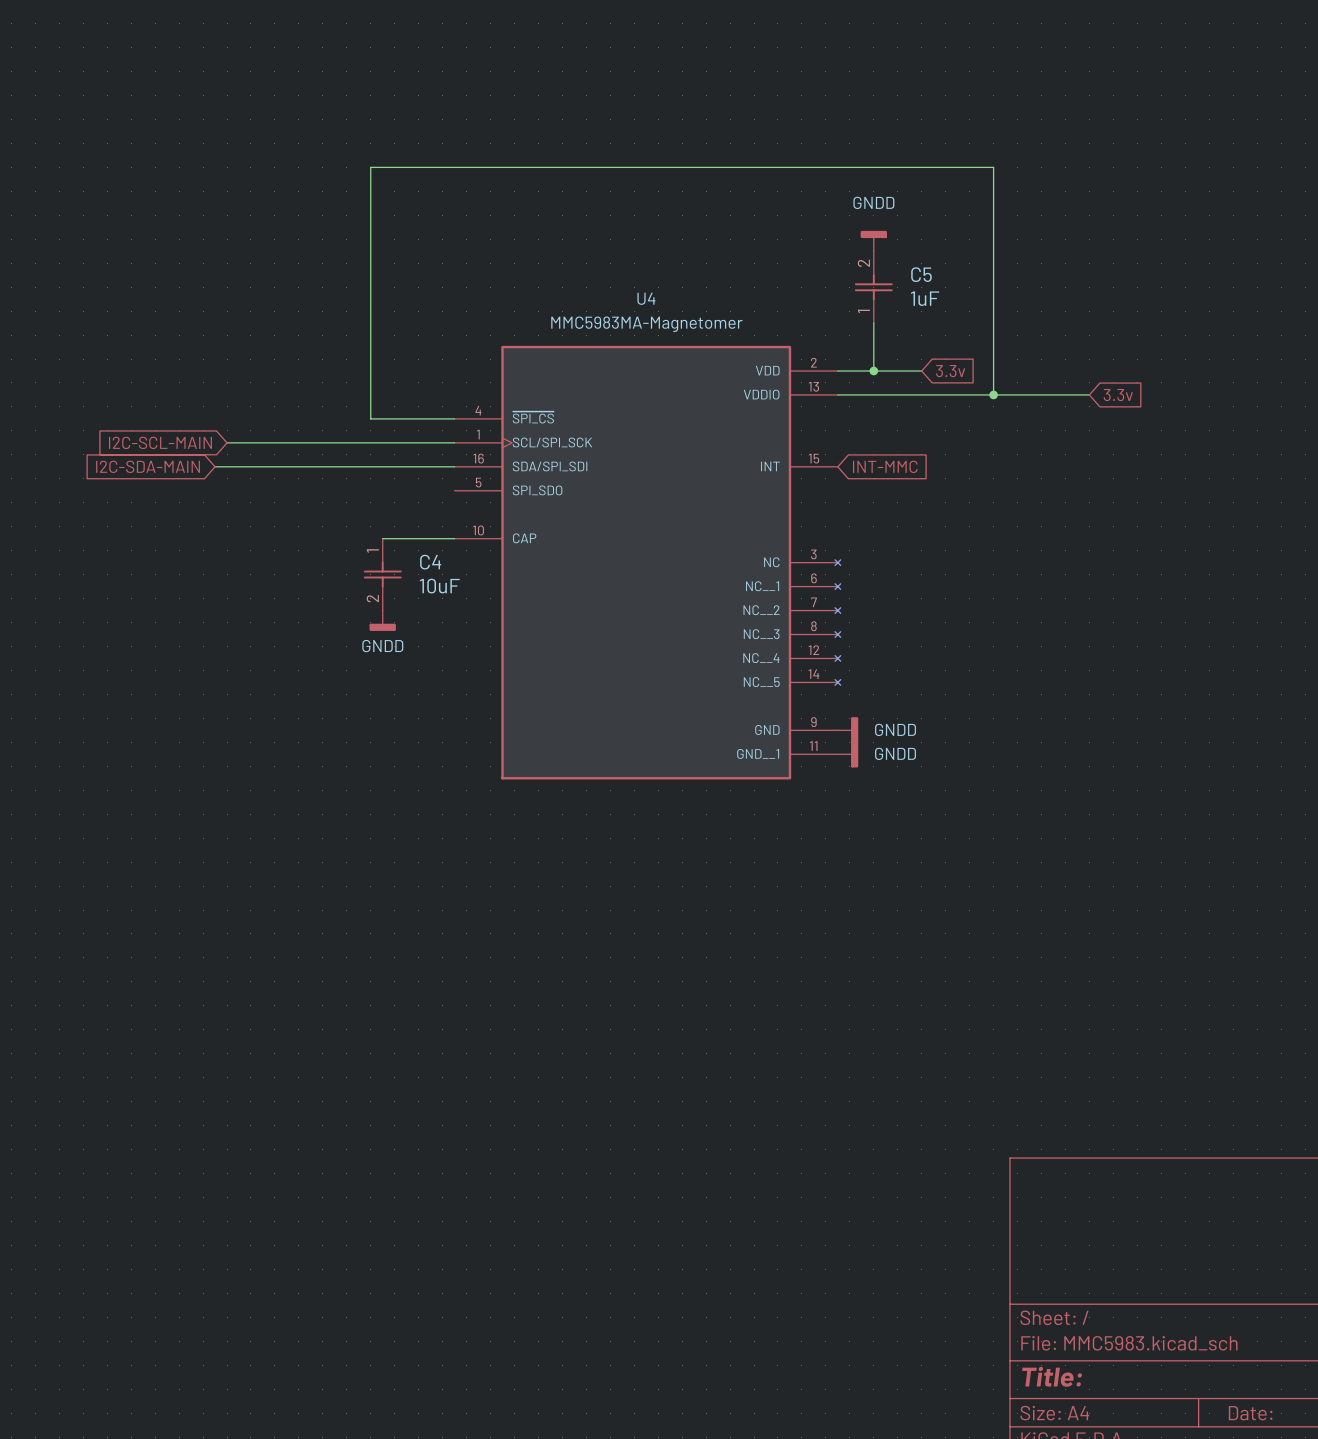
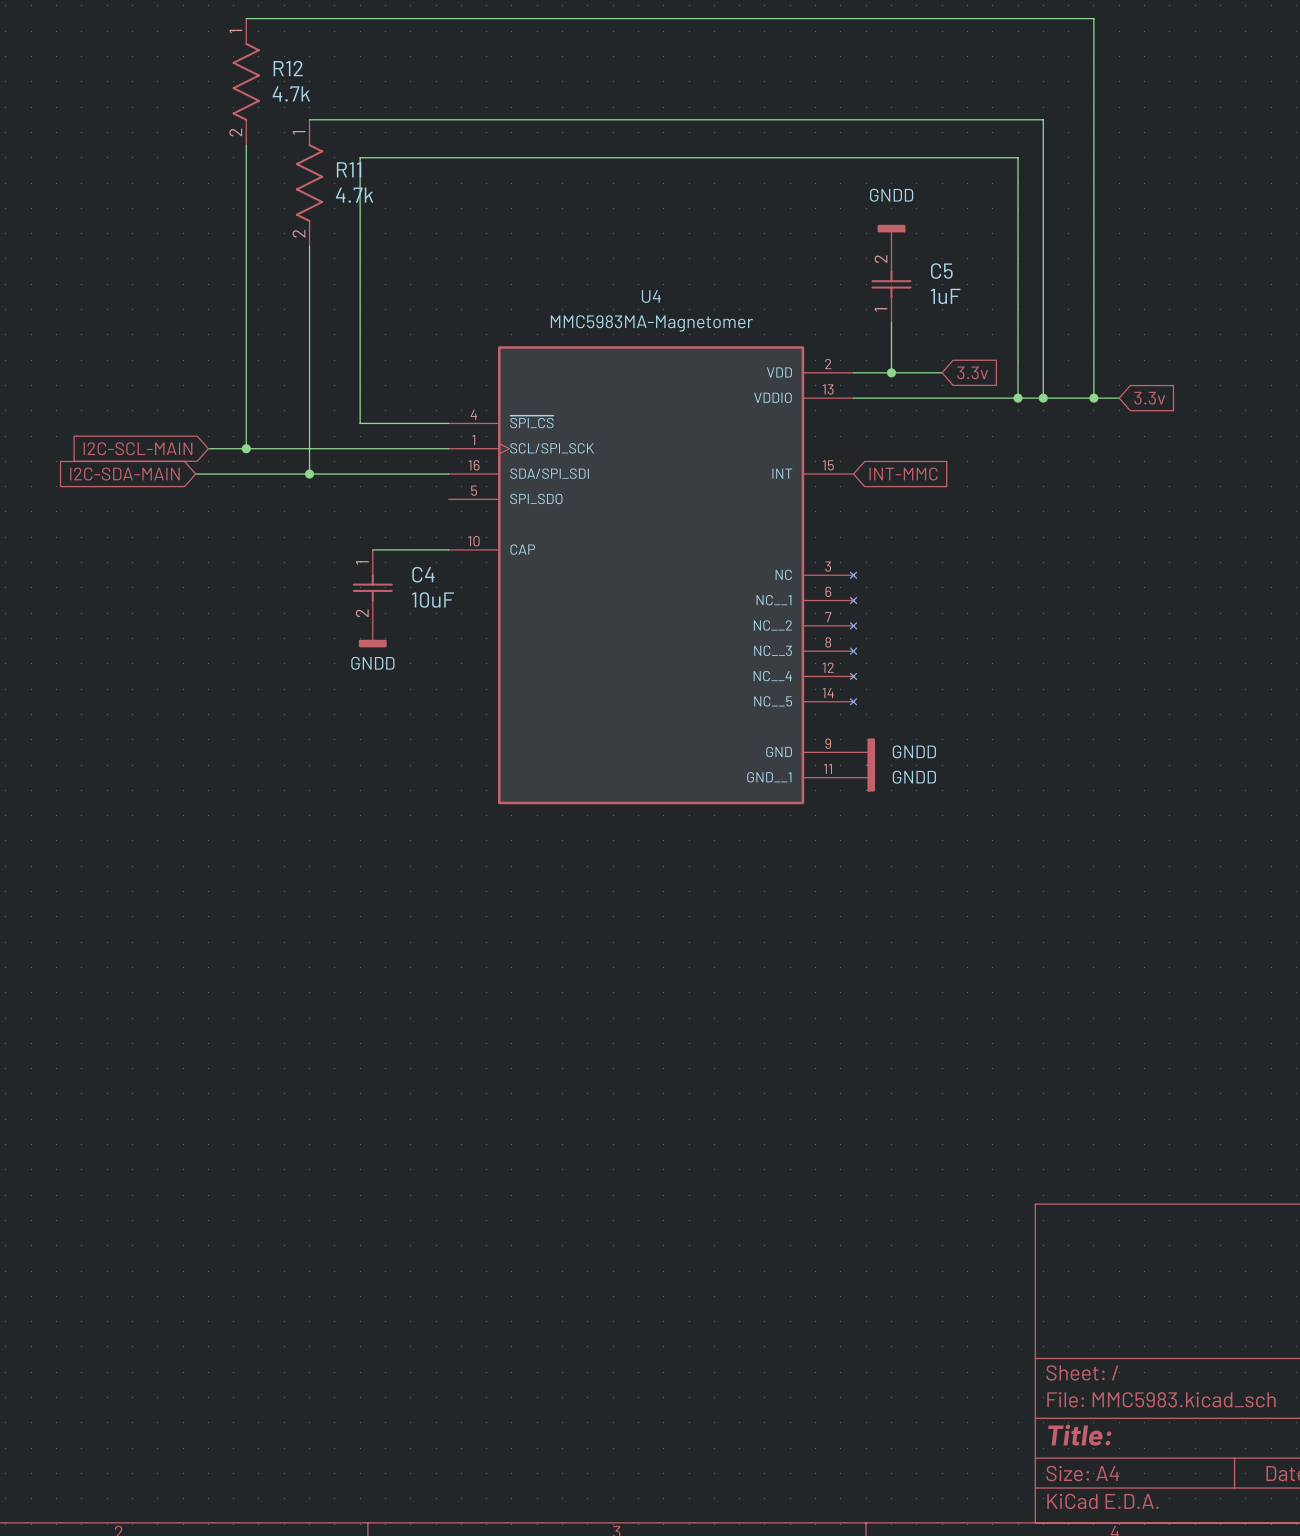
wire: none -> (246, 18) (1093, 18) (1093, 398)
R12: none -> 4.7k (246, 81)
wire: none -> (309, 119) (1043, 119) (1043, 398)
wire: none -> (246, 145) (246, 448)
R11: none -> 4.7k (309, 183)
wire: none -> (309, 246) (309, 474)
junction: none -> (1043, 398)
junction: none -> (1093, 398)
junction: none -> (246, 448)
junction: none -> (309, 474)

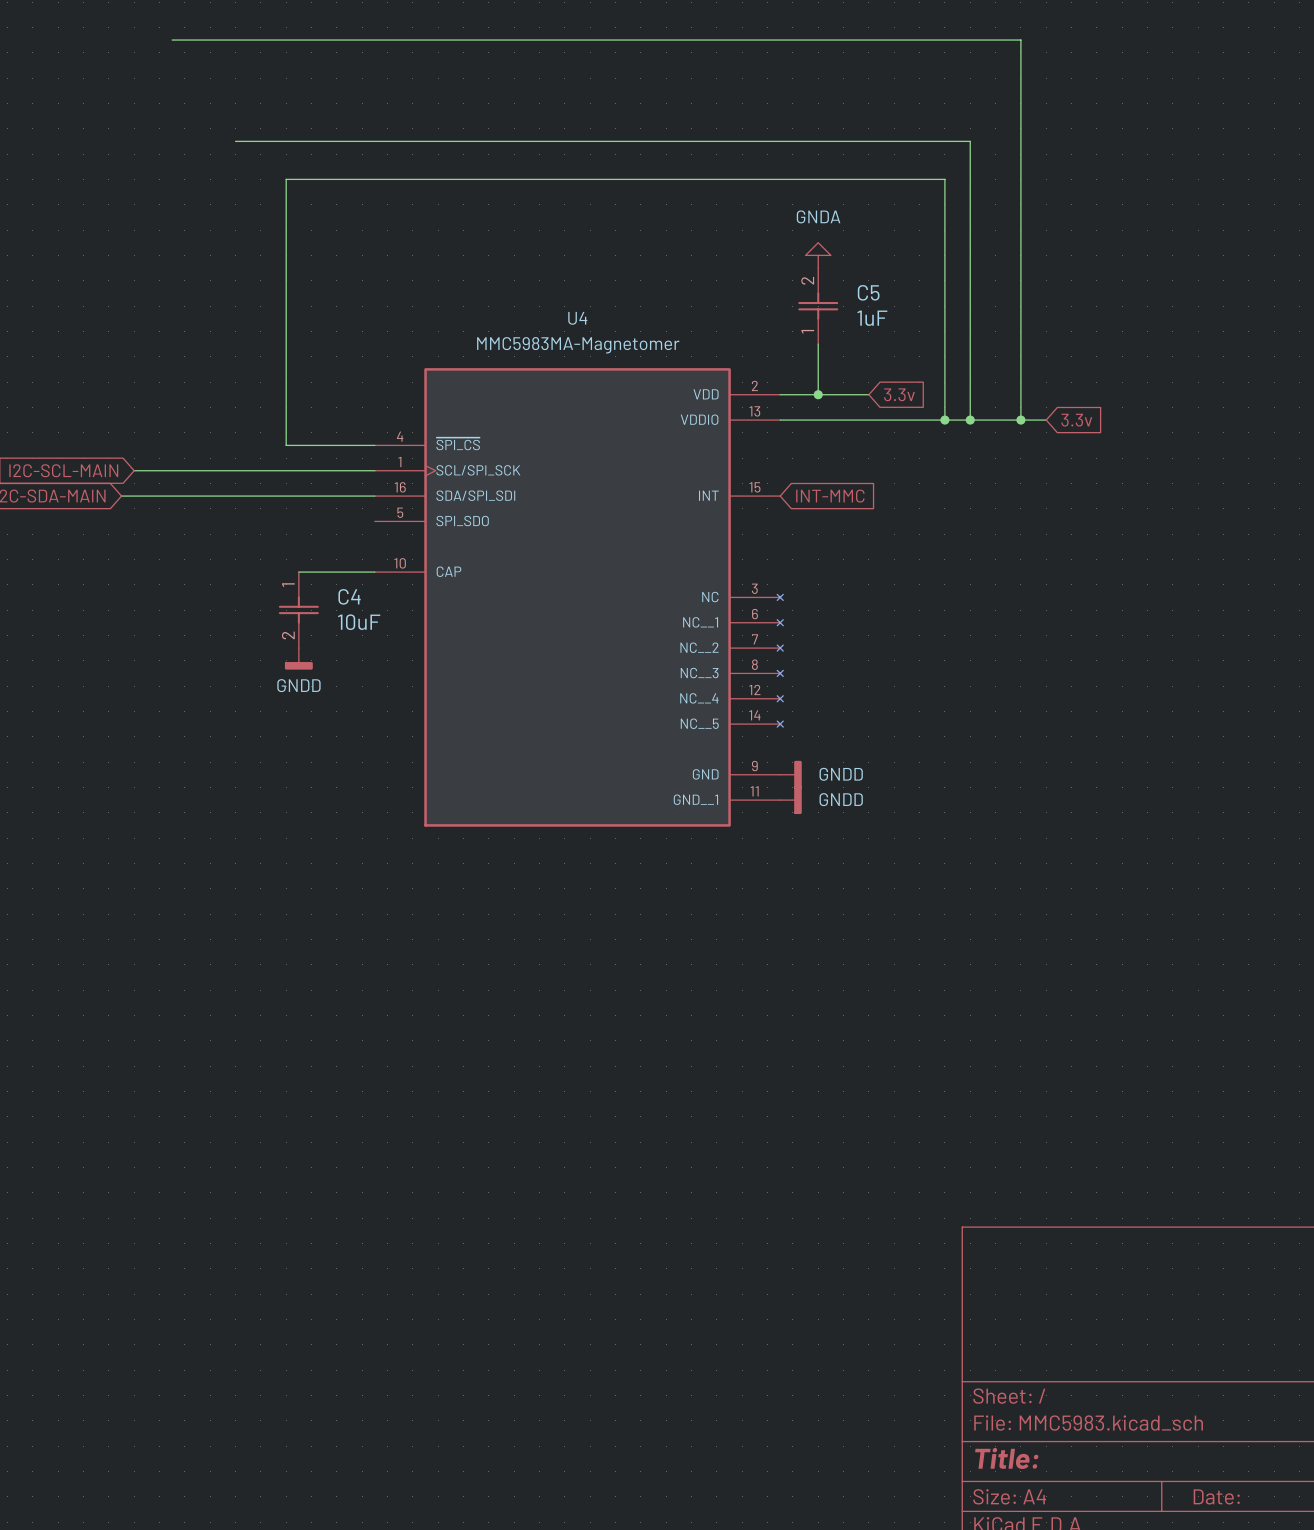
R12: 4.7k (246, 81) -> none
wire: (246, 145) (246, 448) -> none
R11: 4.7k (309, 183) -> none
power symbol: GNDD (891, 235) -> GNDA (818, 255)
wire: (309, 246) (309, 474) -> none
junction: (246, 448) -> none
junction: (309, 474) -> none

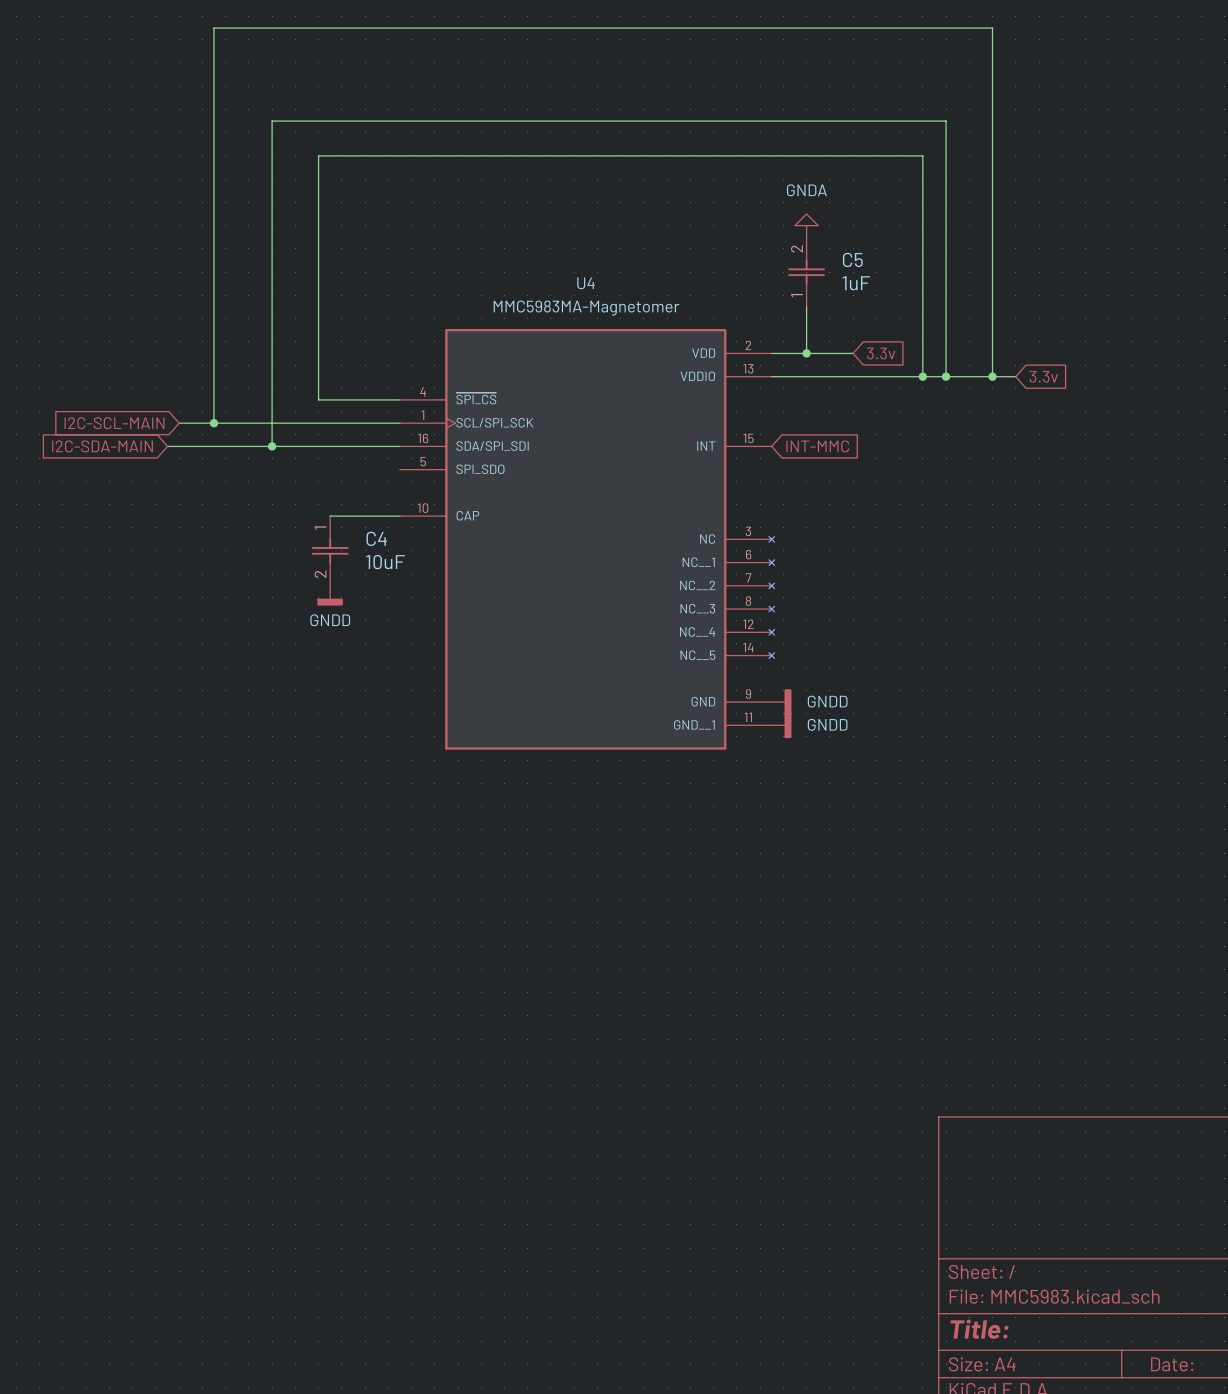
wire: none -> (213, 28) (213, 423)
wire: none -> (272, 121) (272, 446)
junction: none -> (213, 423)
junction: none -> (272, 446)

